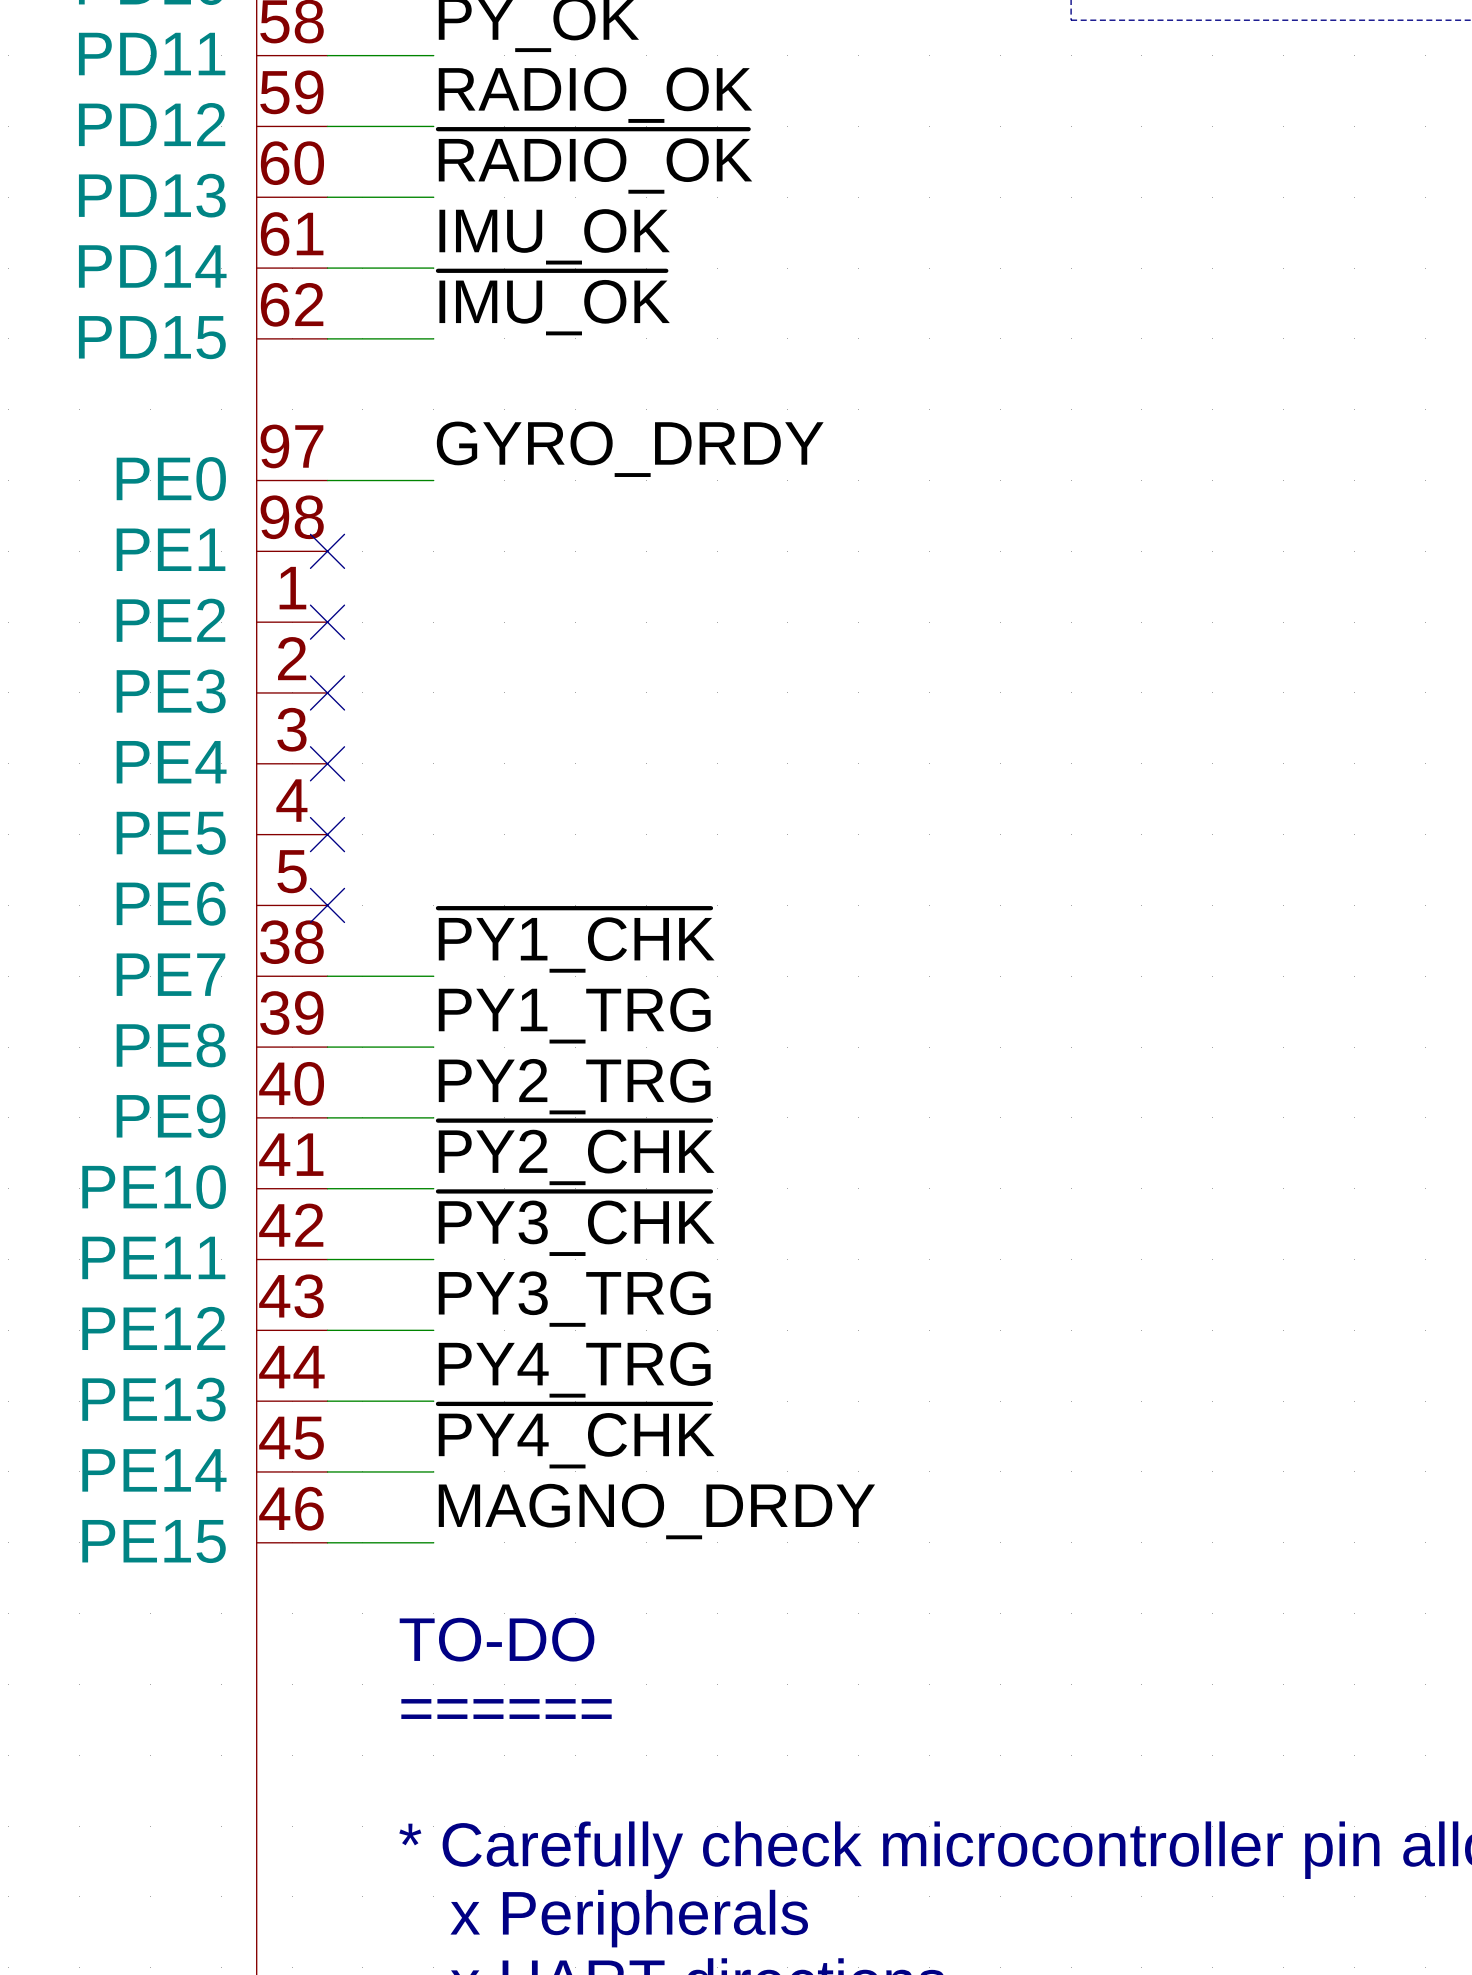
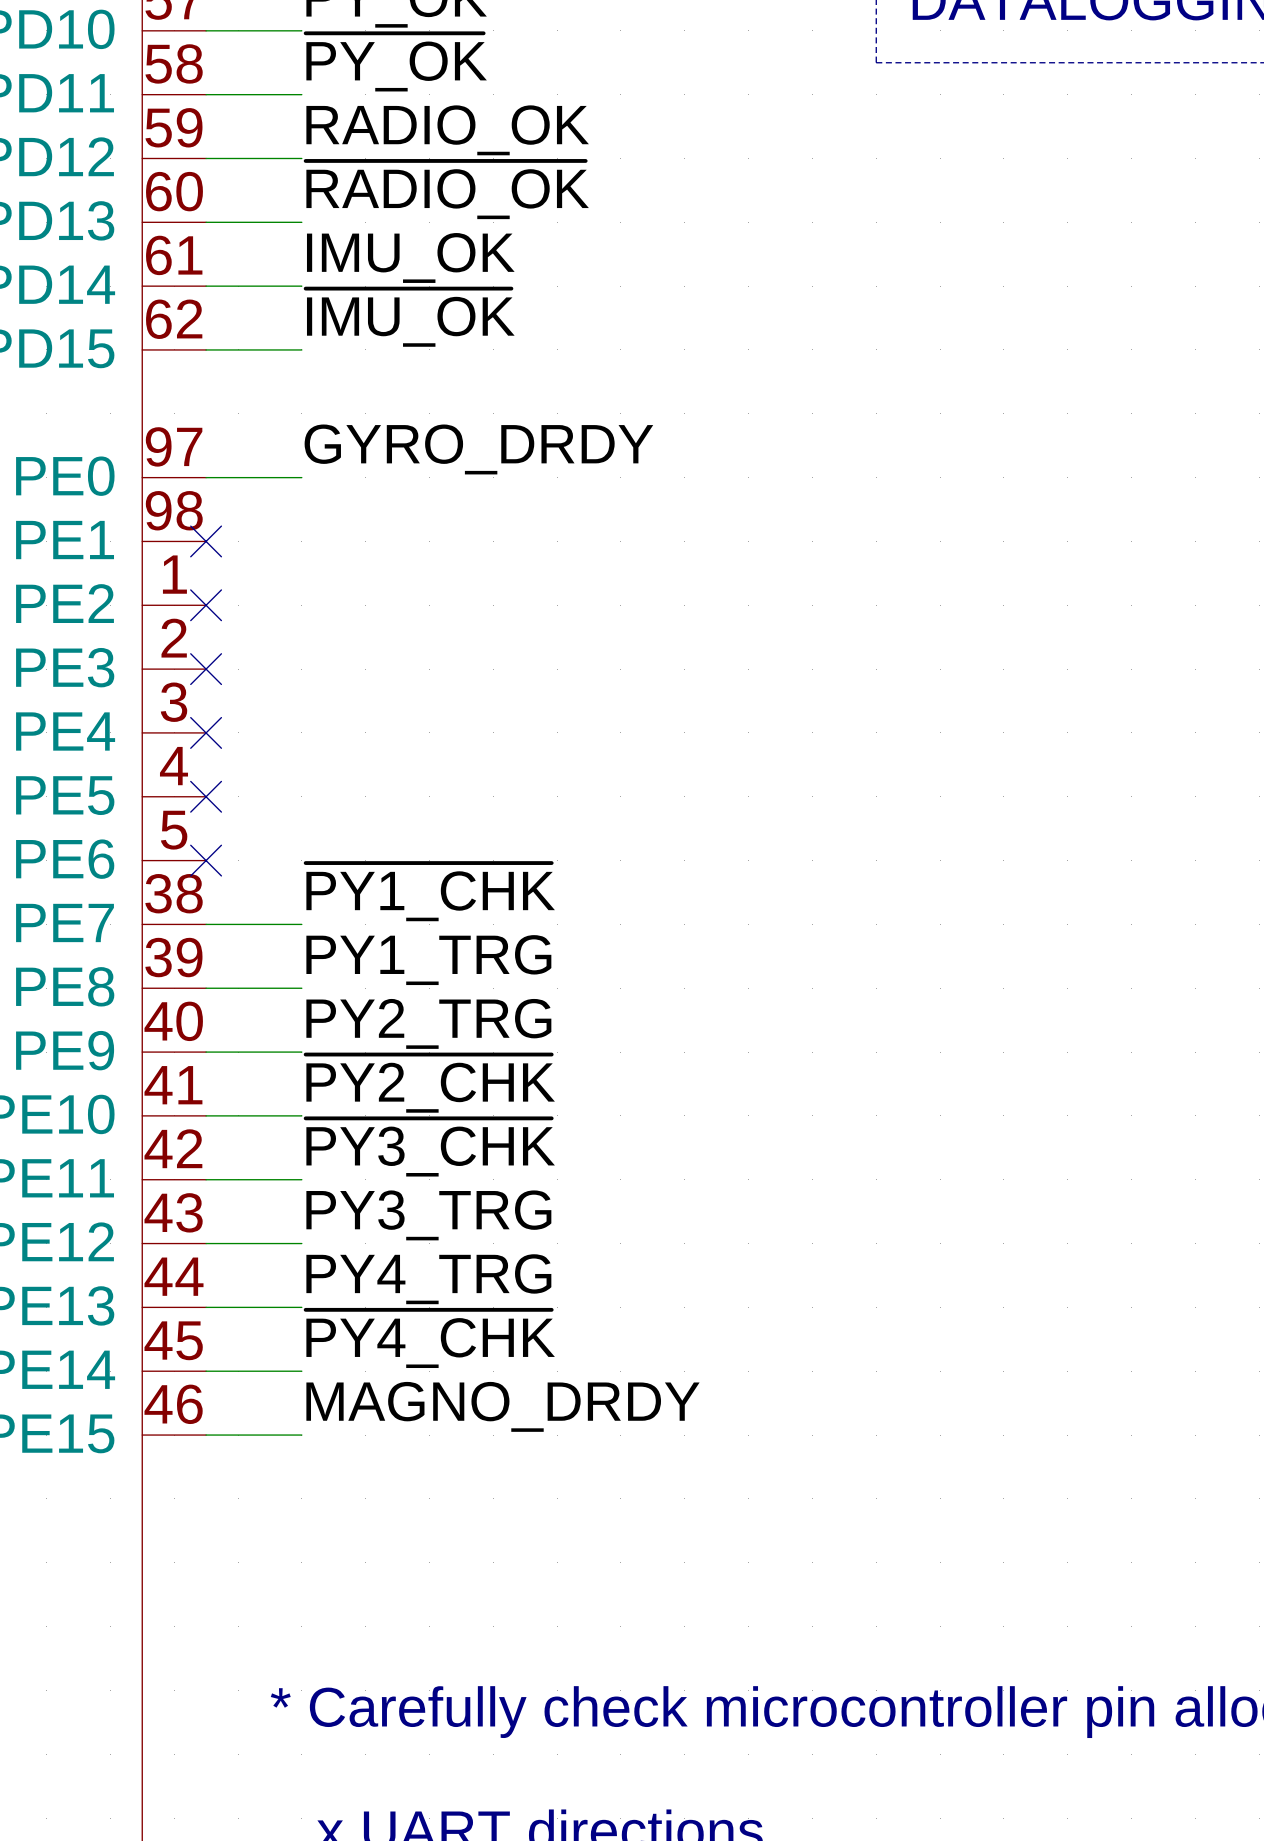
text: TO-DO (497, 1639) -> none
text: ====== (506, 1709) -> none
text: x Peripherals (629, 1918) -> none

